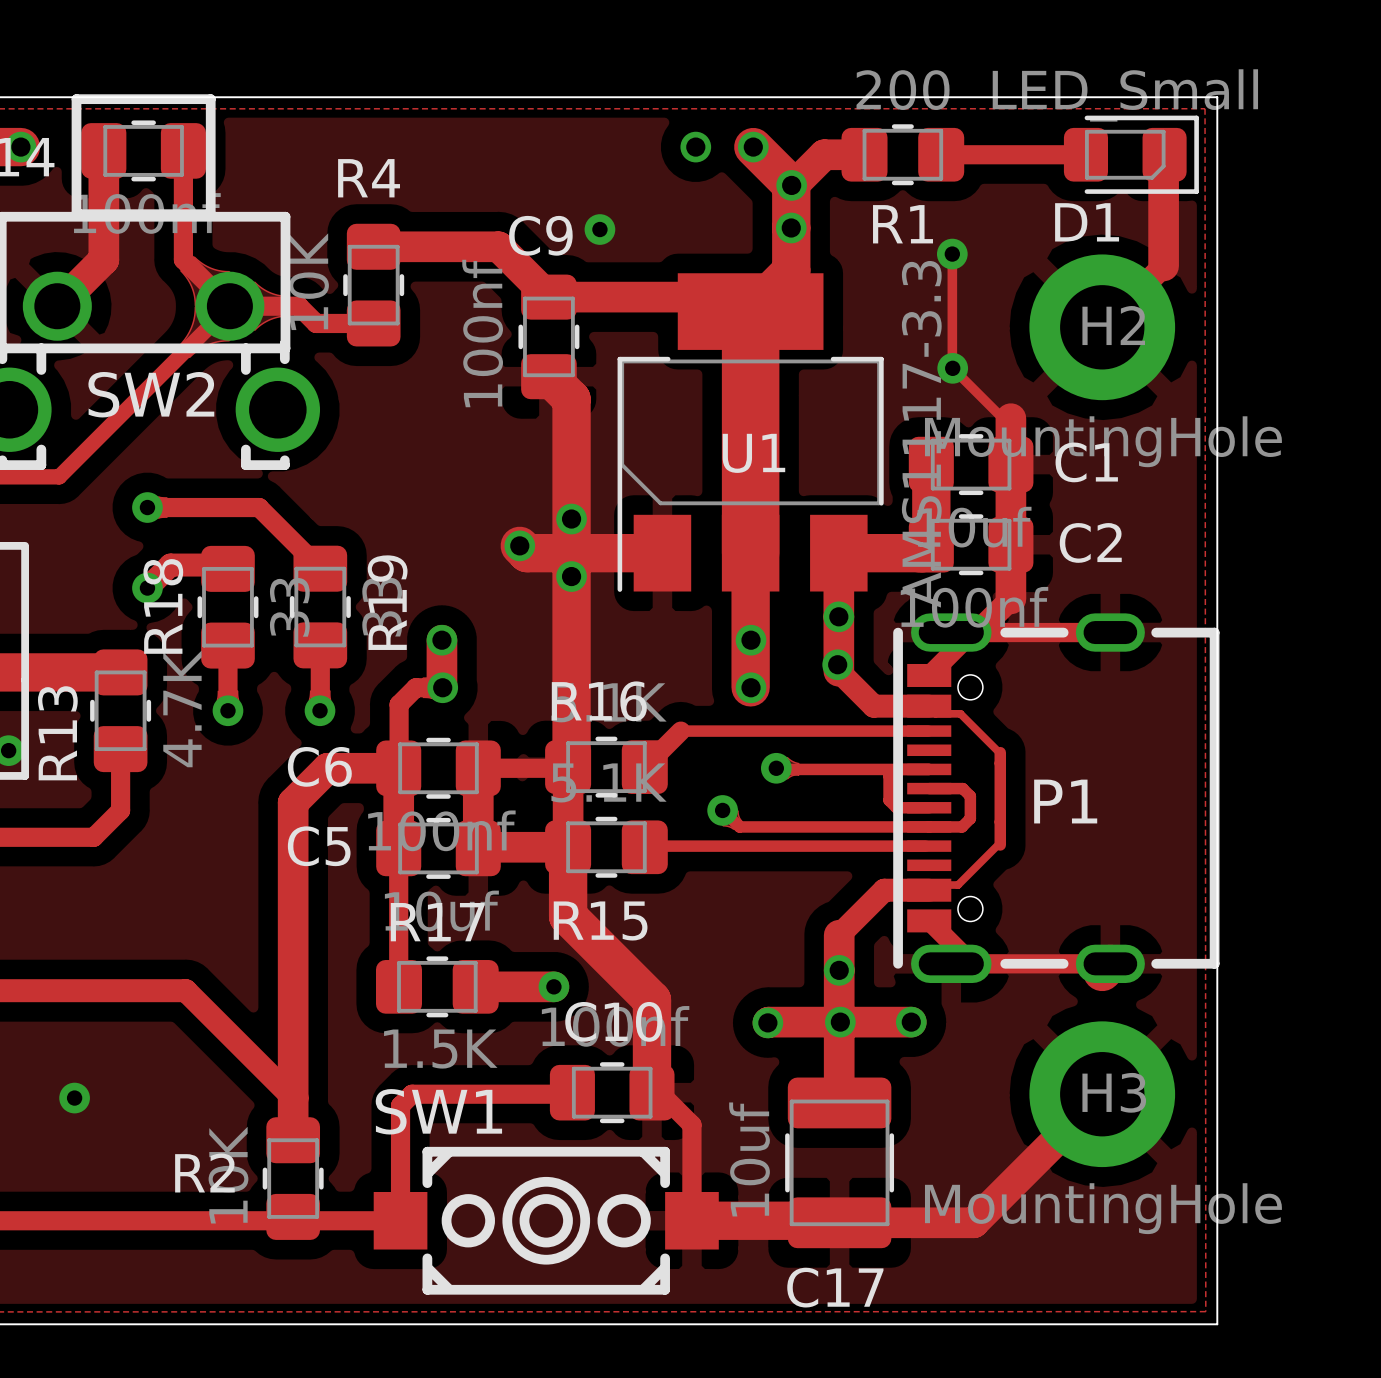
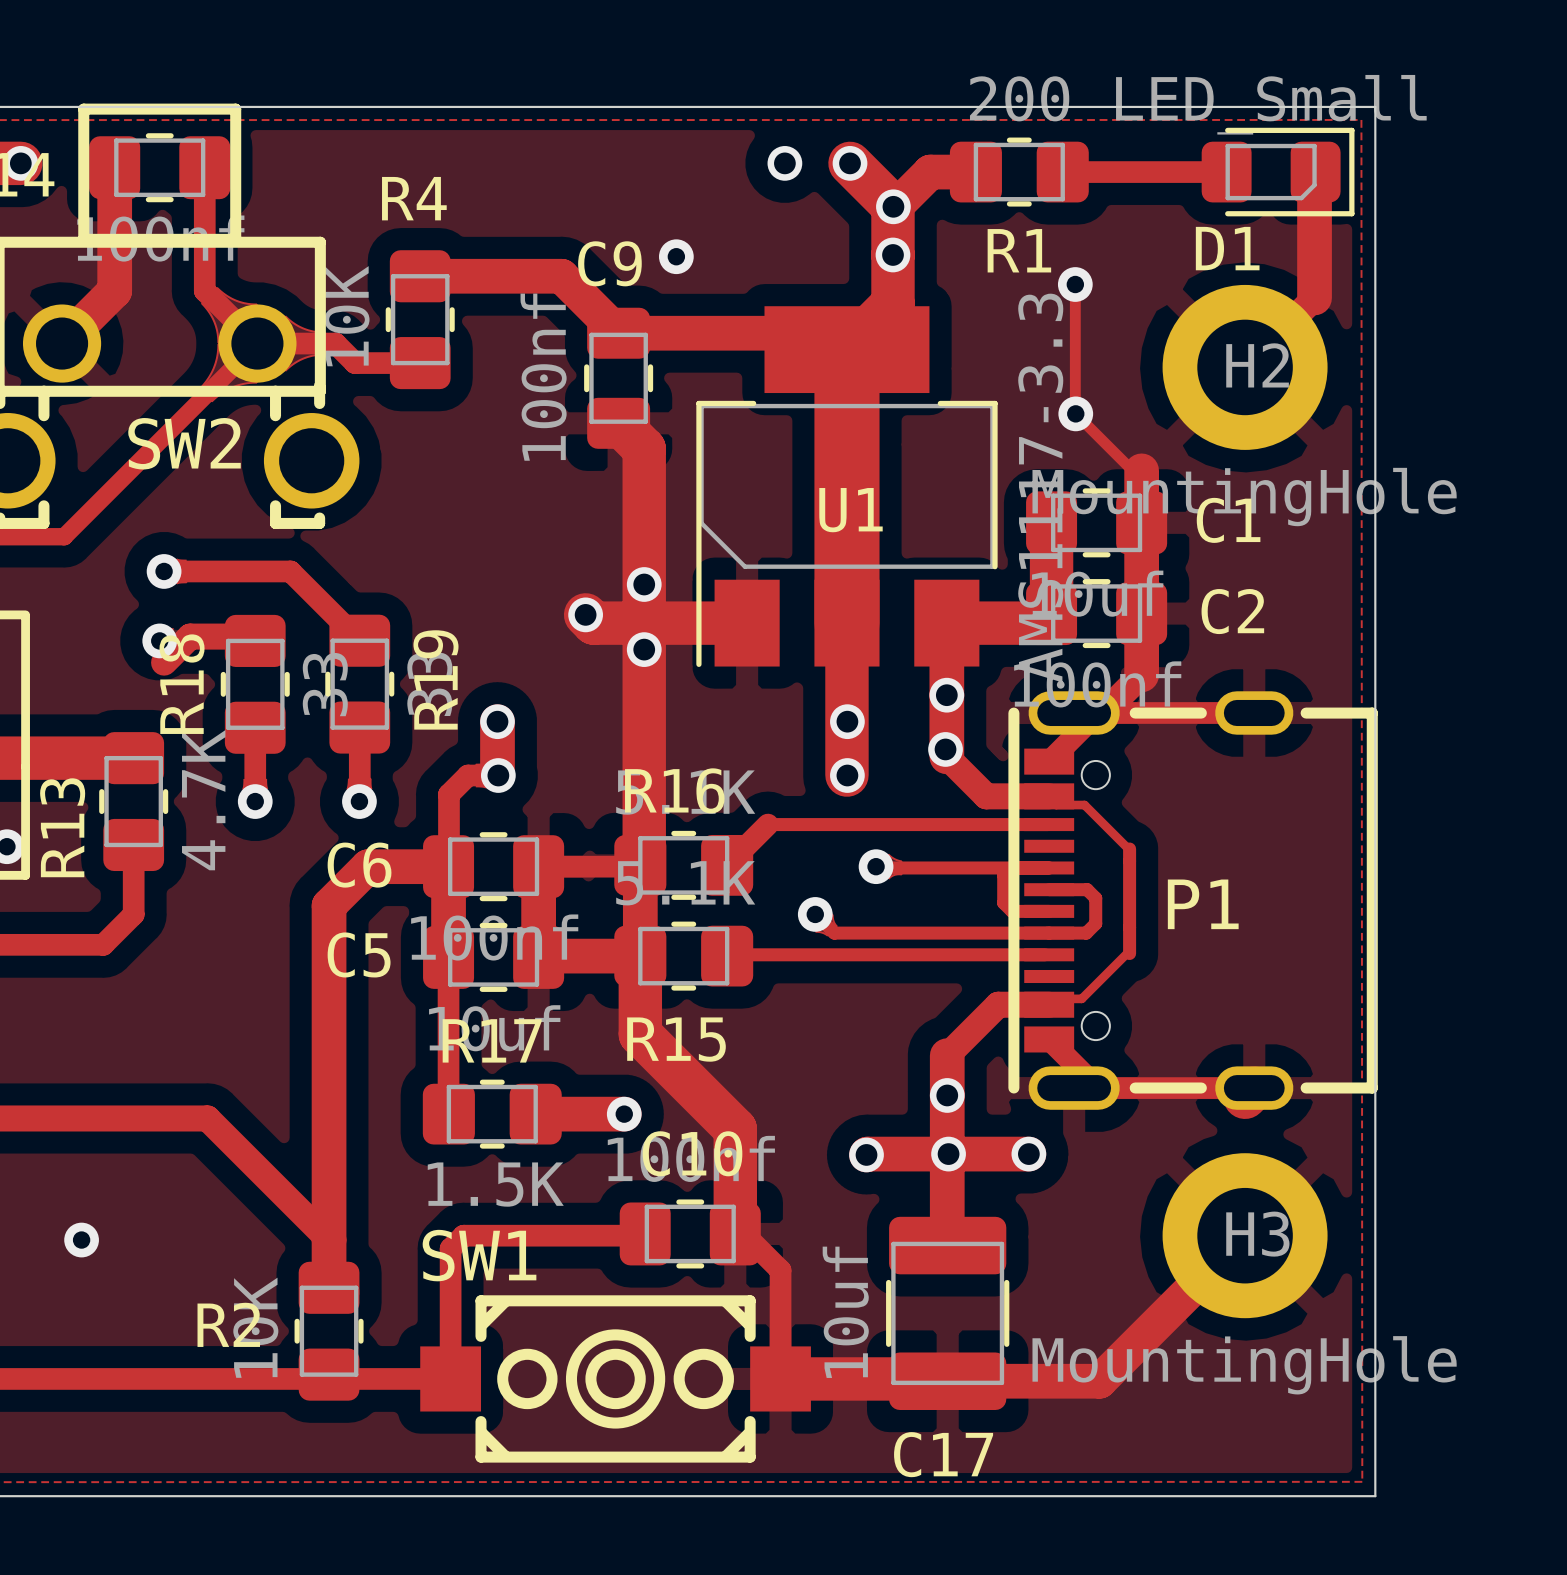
via position: (147, 588) -> (159, 640)

